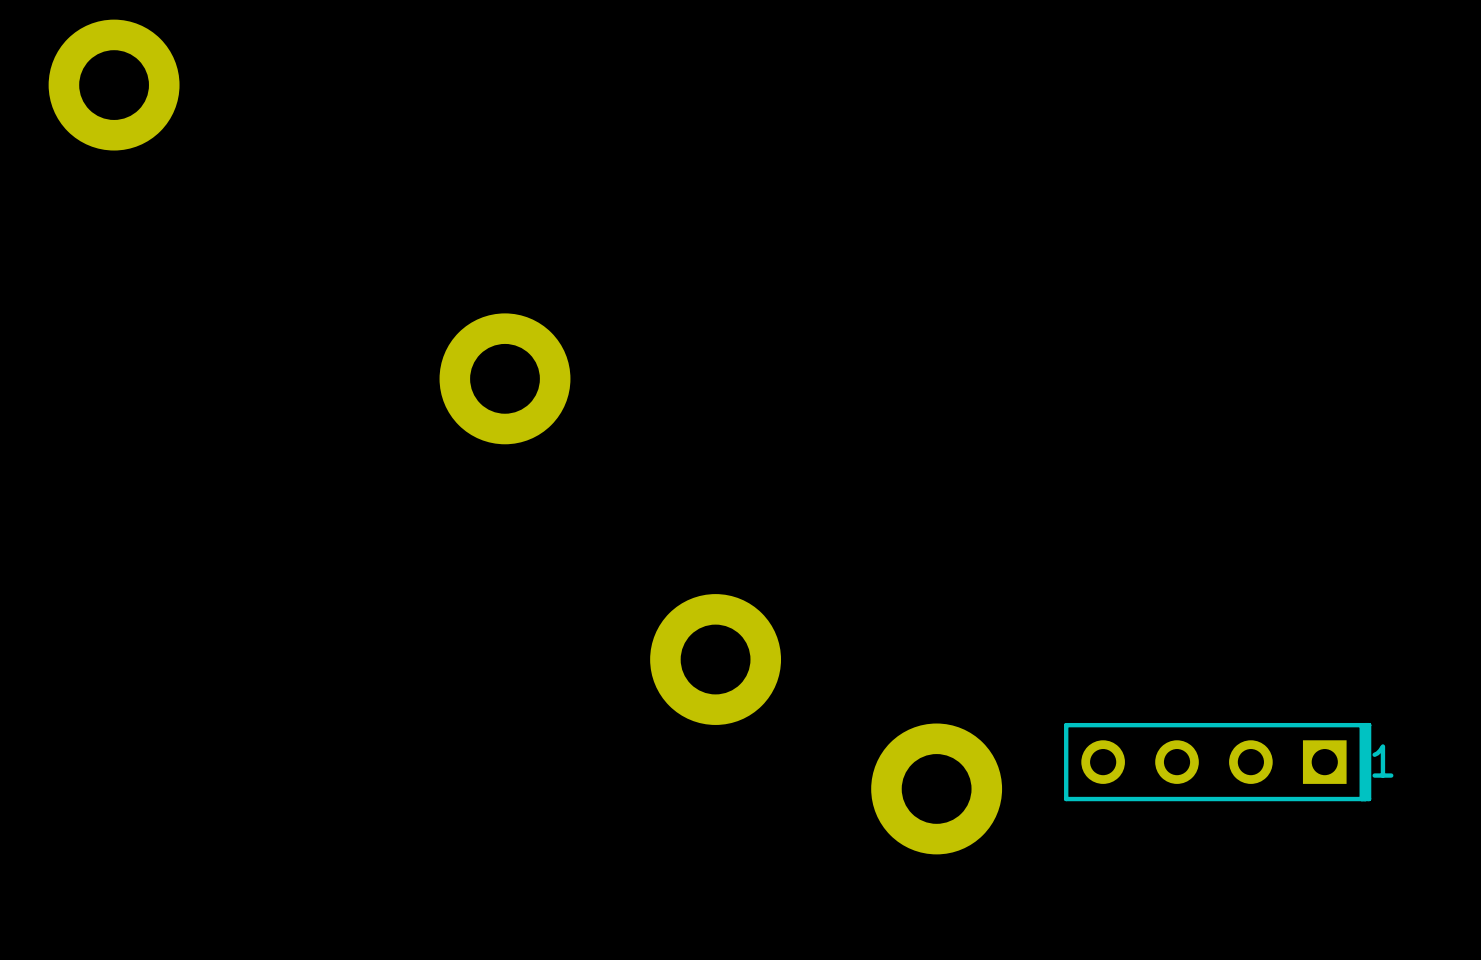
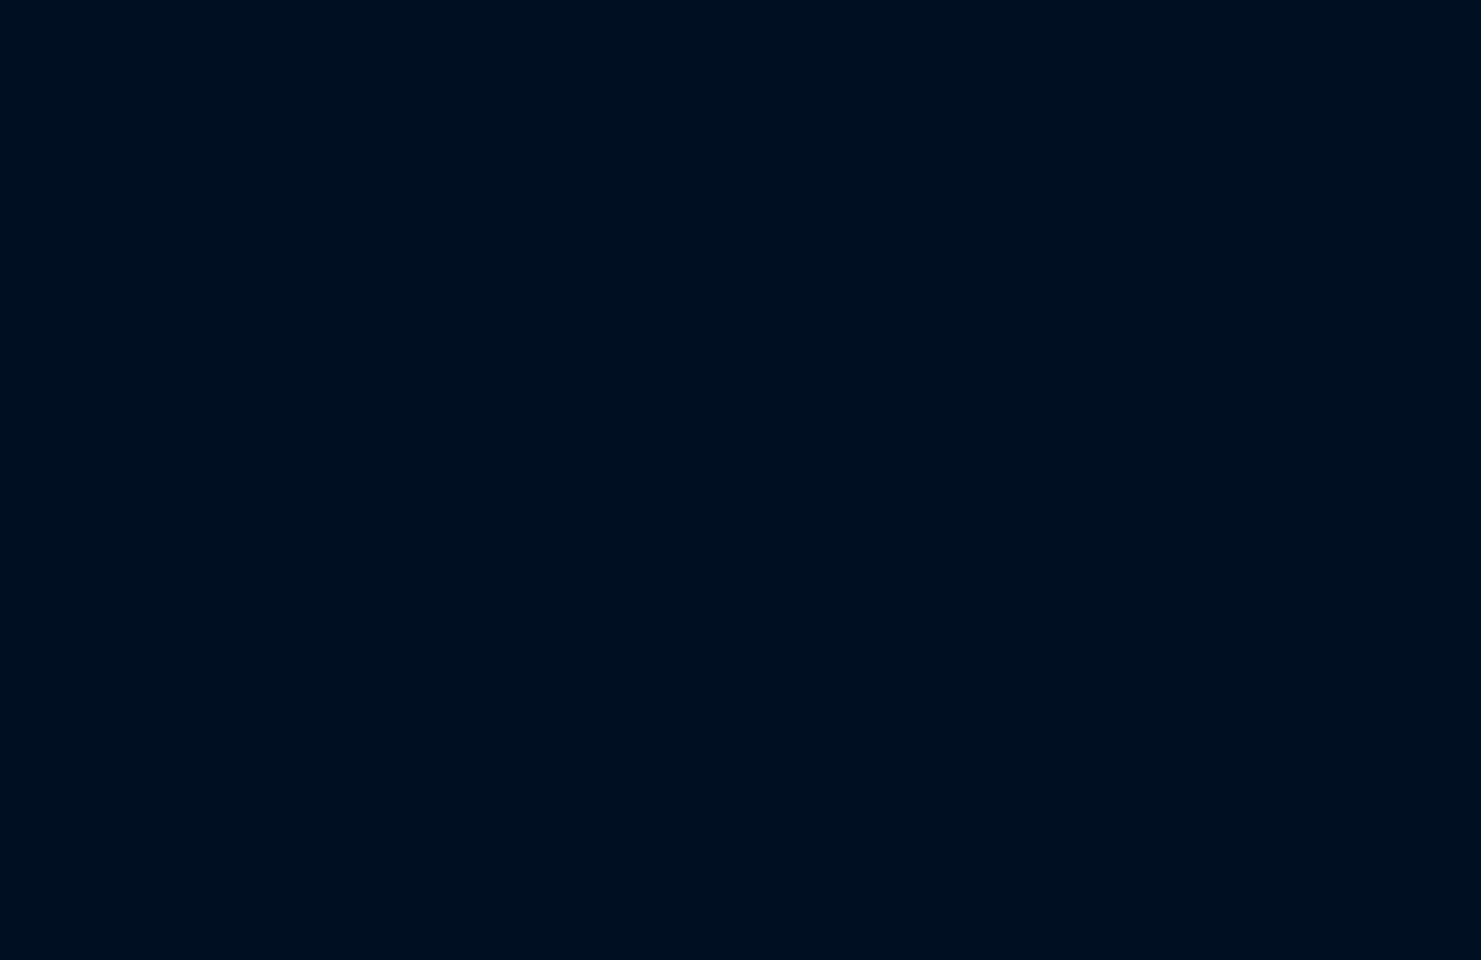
part: (114, 85) -> none
part: (504, 378) -> none
part: (715, 659) -> none
part: (1217, 762) -> none
part: (936, 788) -> none

